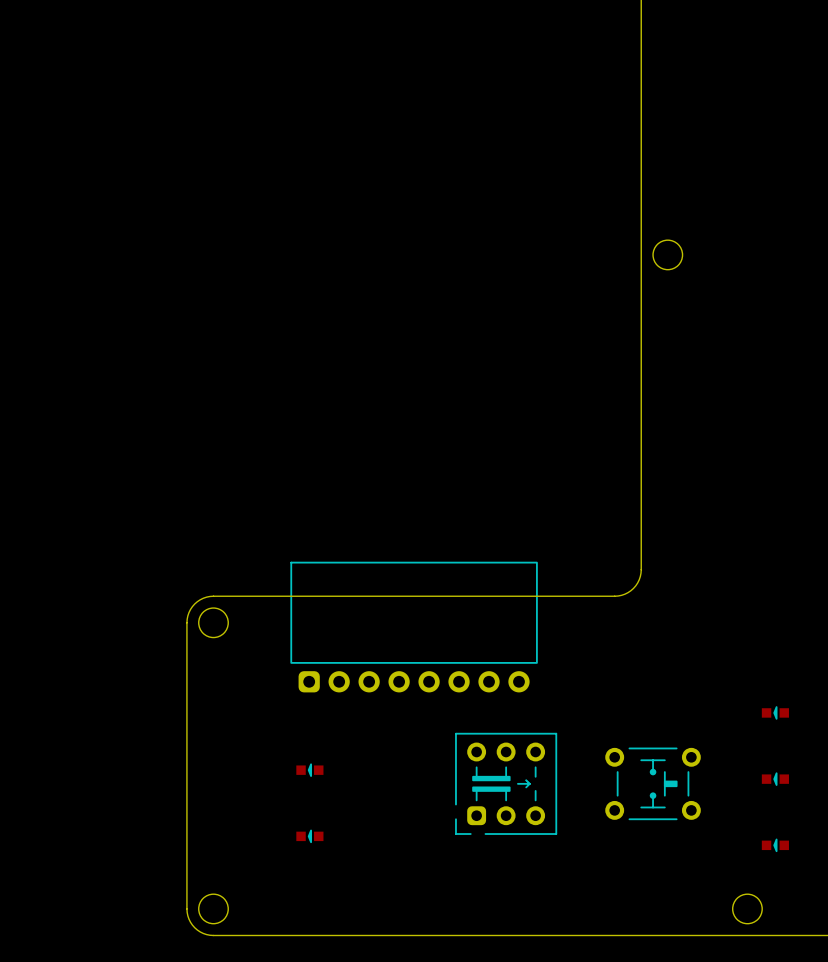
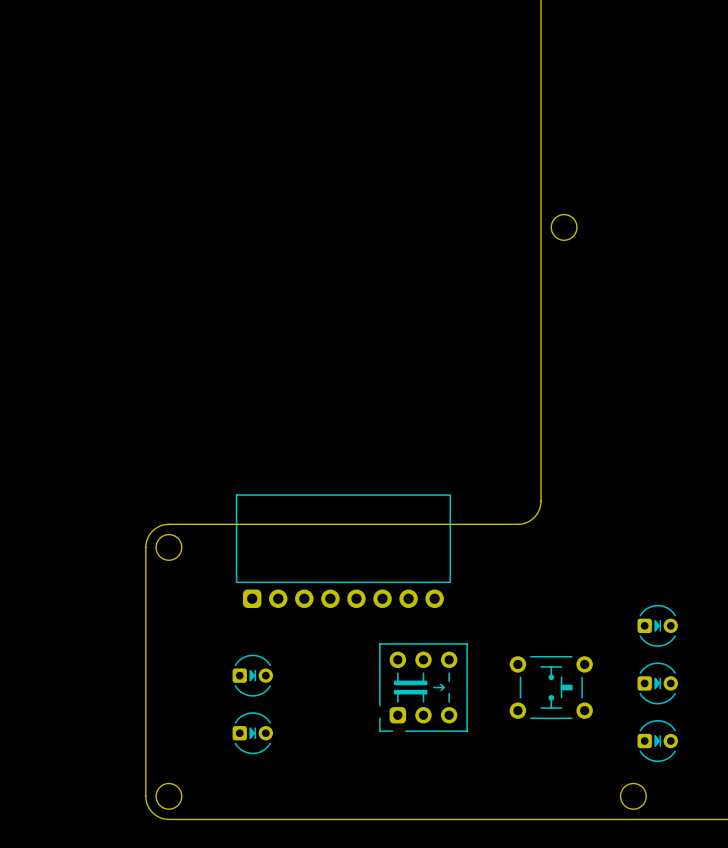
part footprint: [761, 706, 789, 720] -> [637, 604, 678, 647]
part footprint: [296, 763, 324, 777] -> [232, 654, 274, 697]
part footprint: [761, 772, 789, 786] -> [637, 662, 678, 705]
part footprint: [296, 829, 324, 844] -> [232, 712, 274, 755]
part footprint: [761, 838, 789, 853] -> [637, 719, 678, 763]

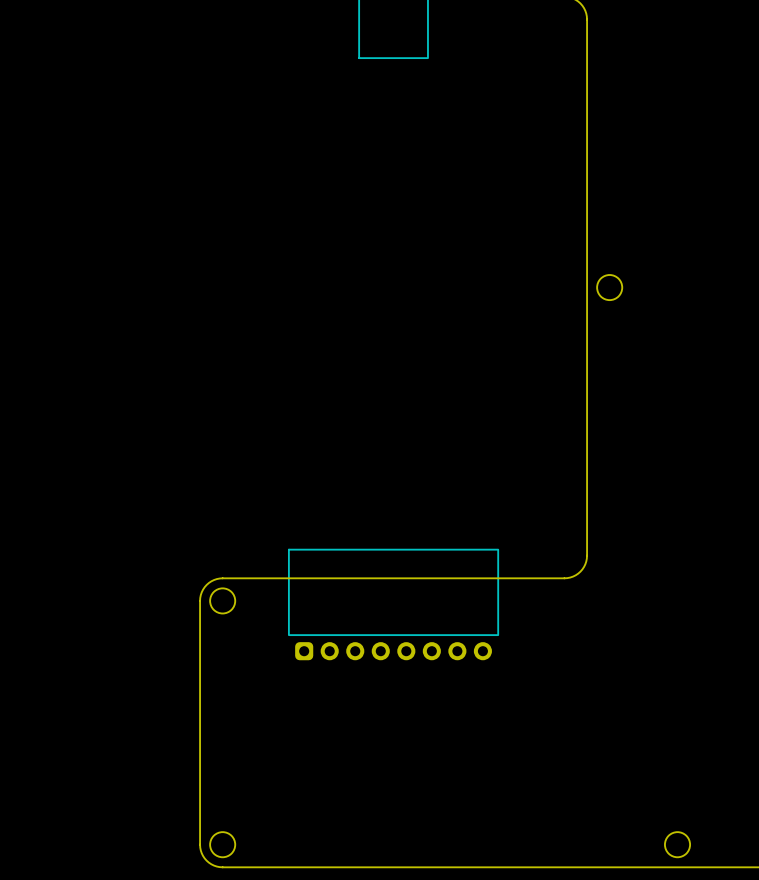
part: (657, 625) -> none
part: (252, 675) -> none
part: (657, 683) -> none
part: (423, 687) -> none
part: (551, 687) -> none
part: (252, 733) -> none
part: (657, 741) -> none

